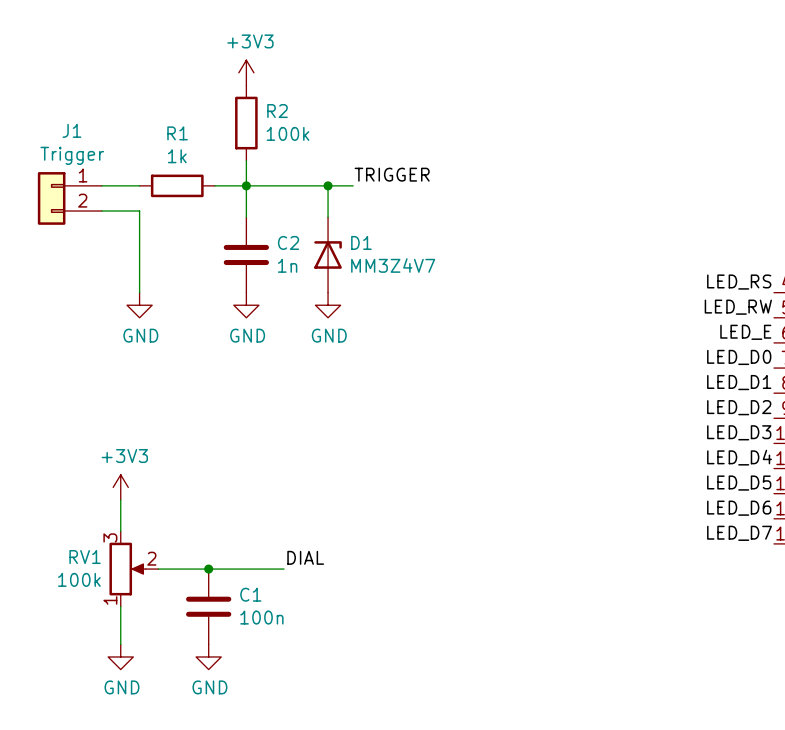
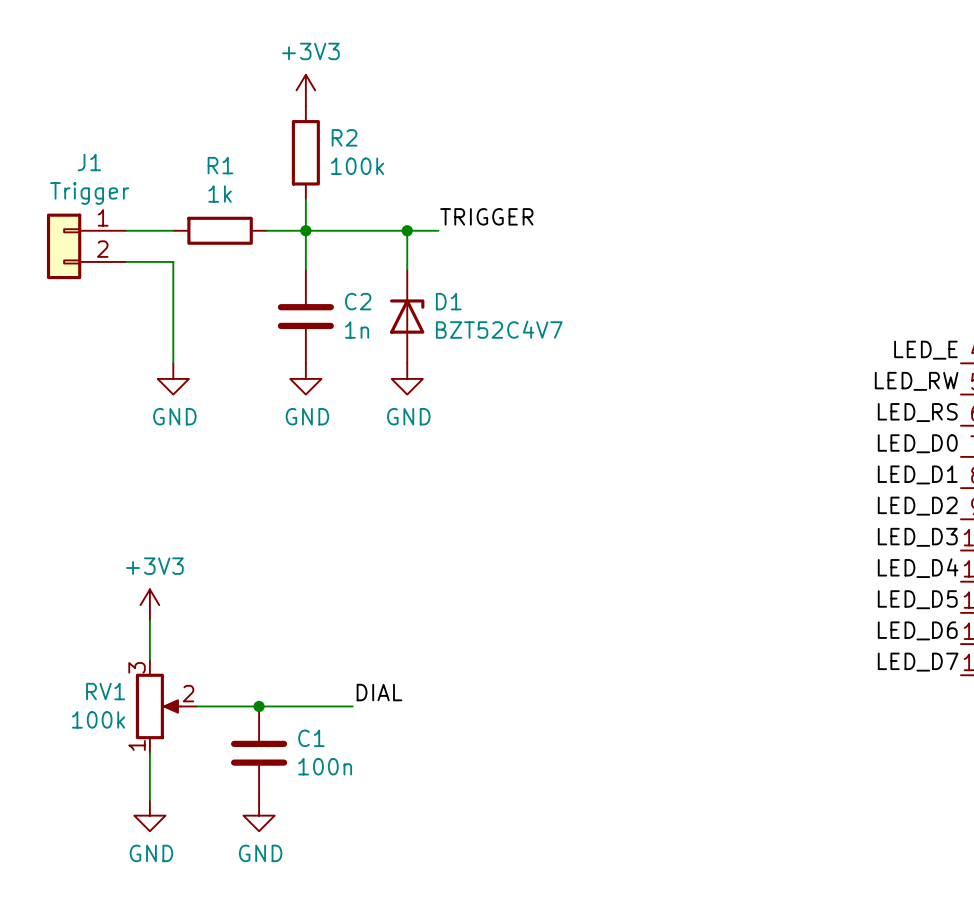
D1 value: MM3Z4V7 (393, 265) -> BZT52C4V7 (499, 329)
label: LED_RS (739, 282) -> LED_E (925, 350)
label: LED_E (745, 332) -> LED_RS (917, 412)

